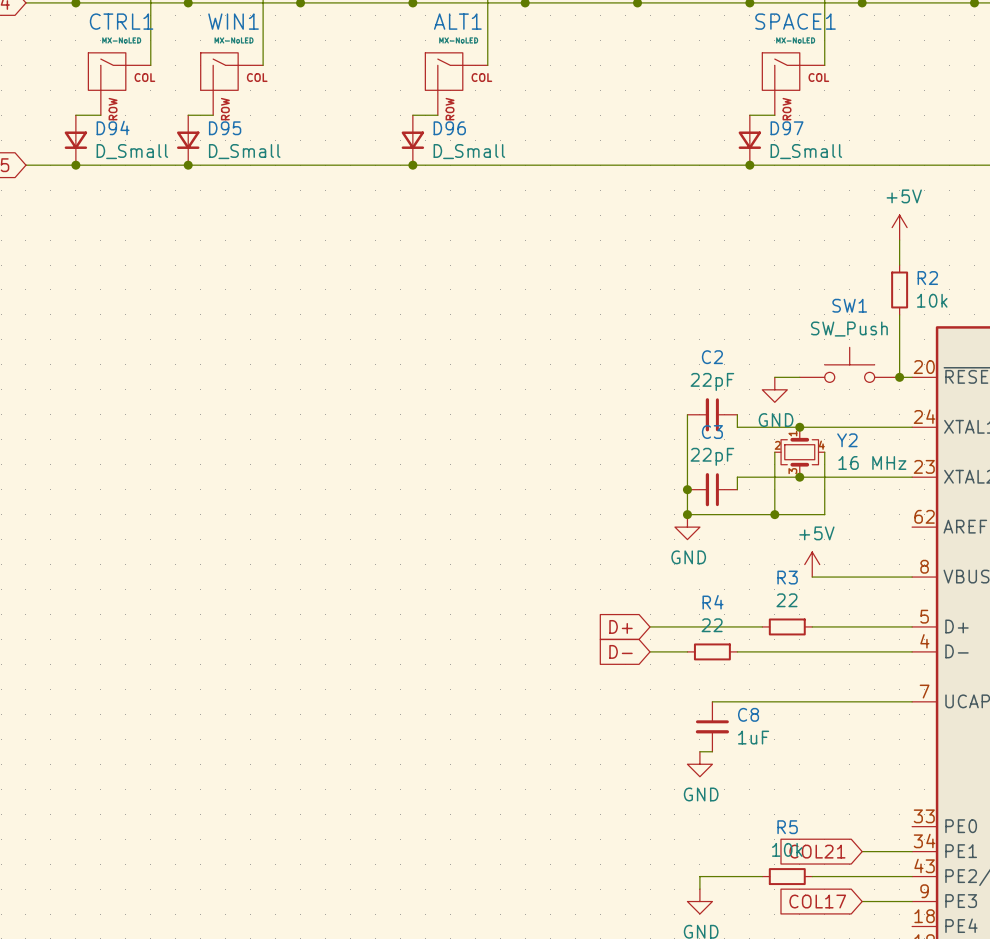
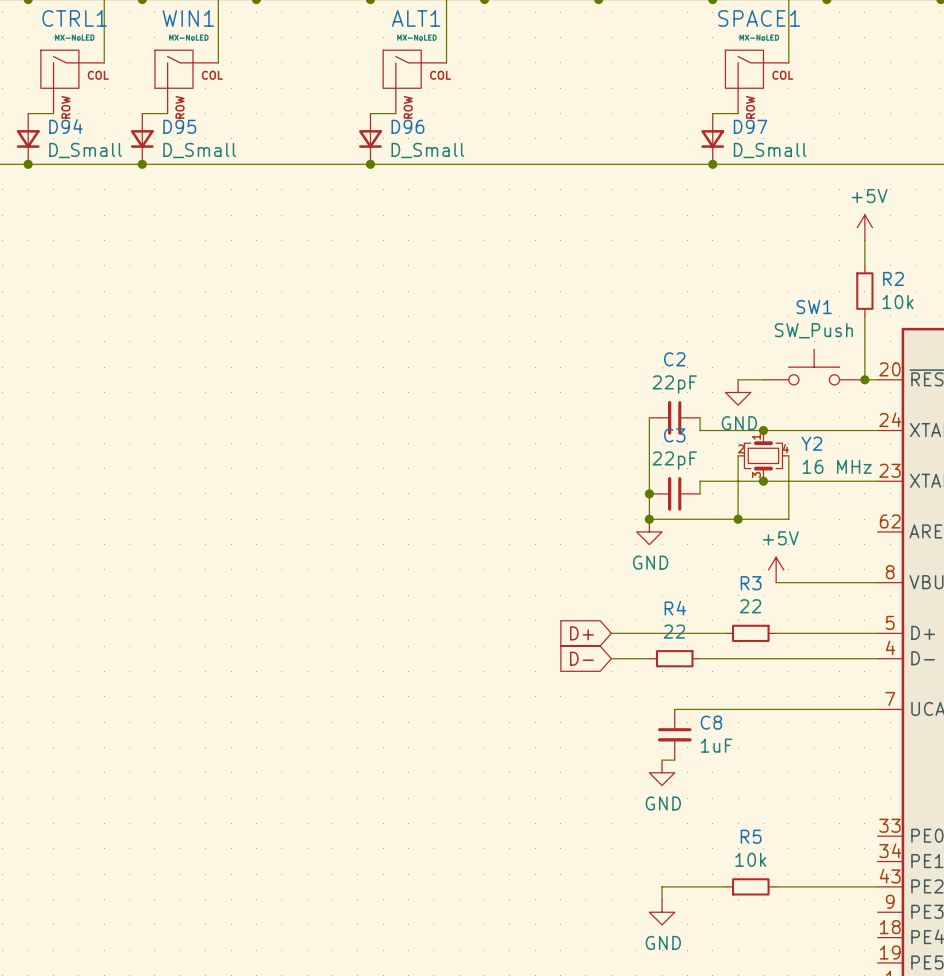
global label: COL21 (817, 851) -> none
wire: (862, 851) (912, 851) -> none
global label: COL17 (817, 901) -> none
wire: (862, 901) (912, 901) -> none

